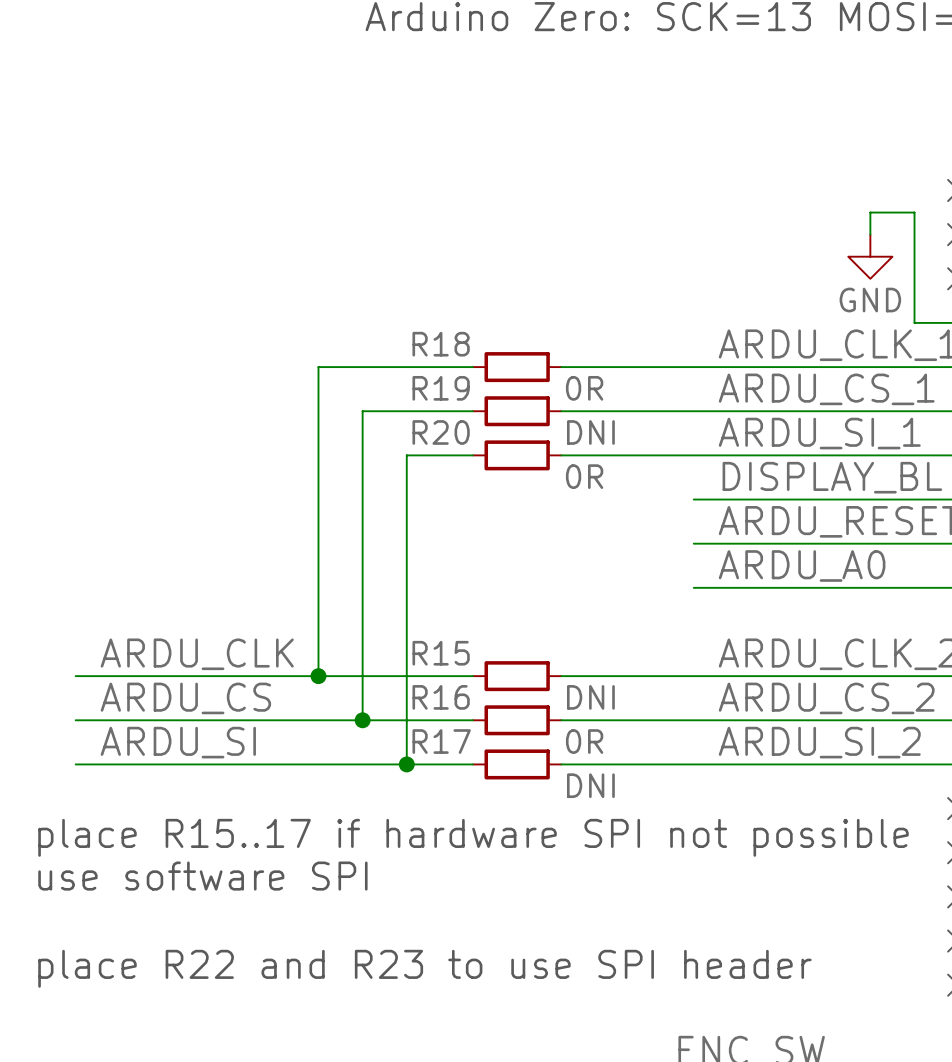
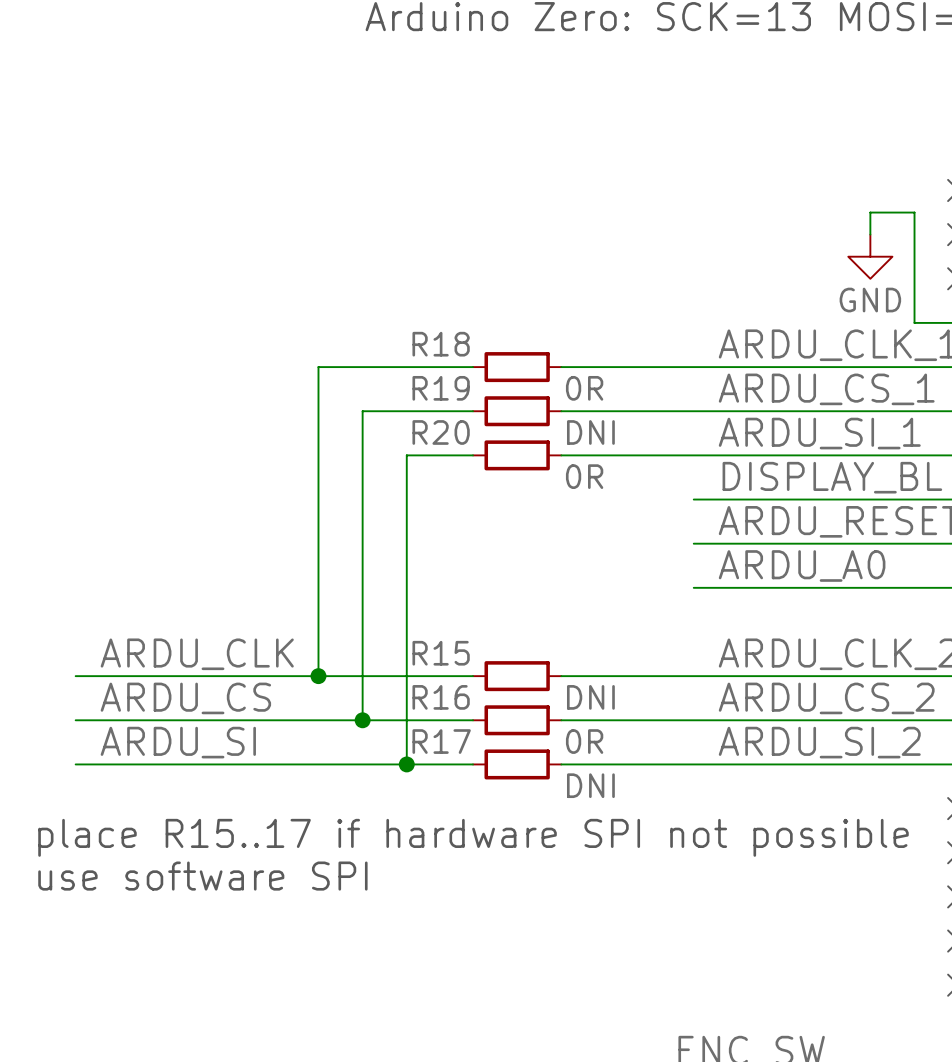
text: place R22 and R23 to use SPI header (424, 968) -> none

